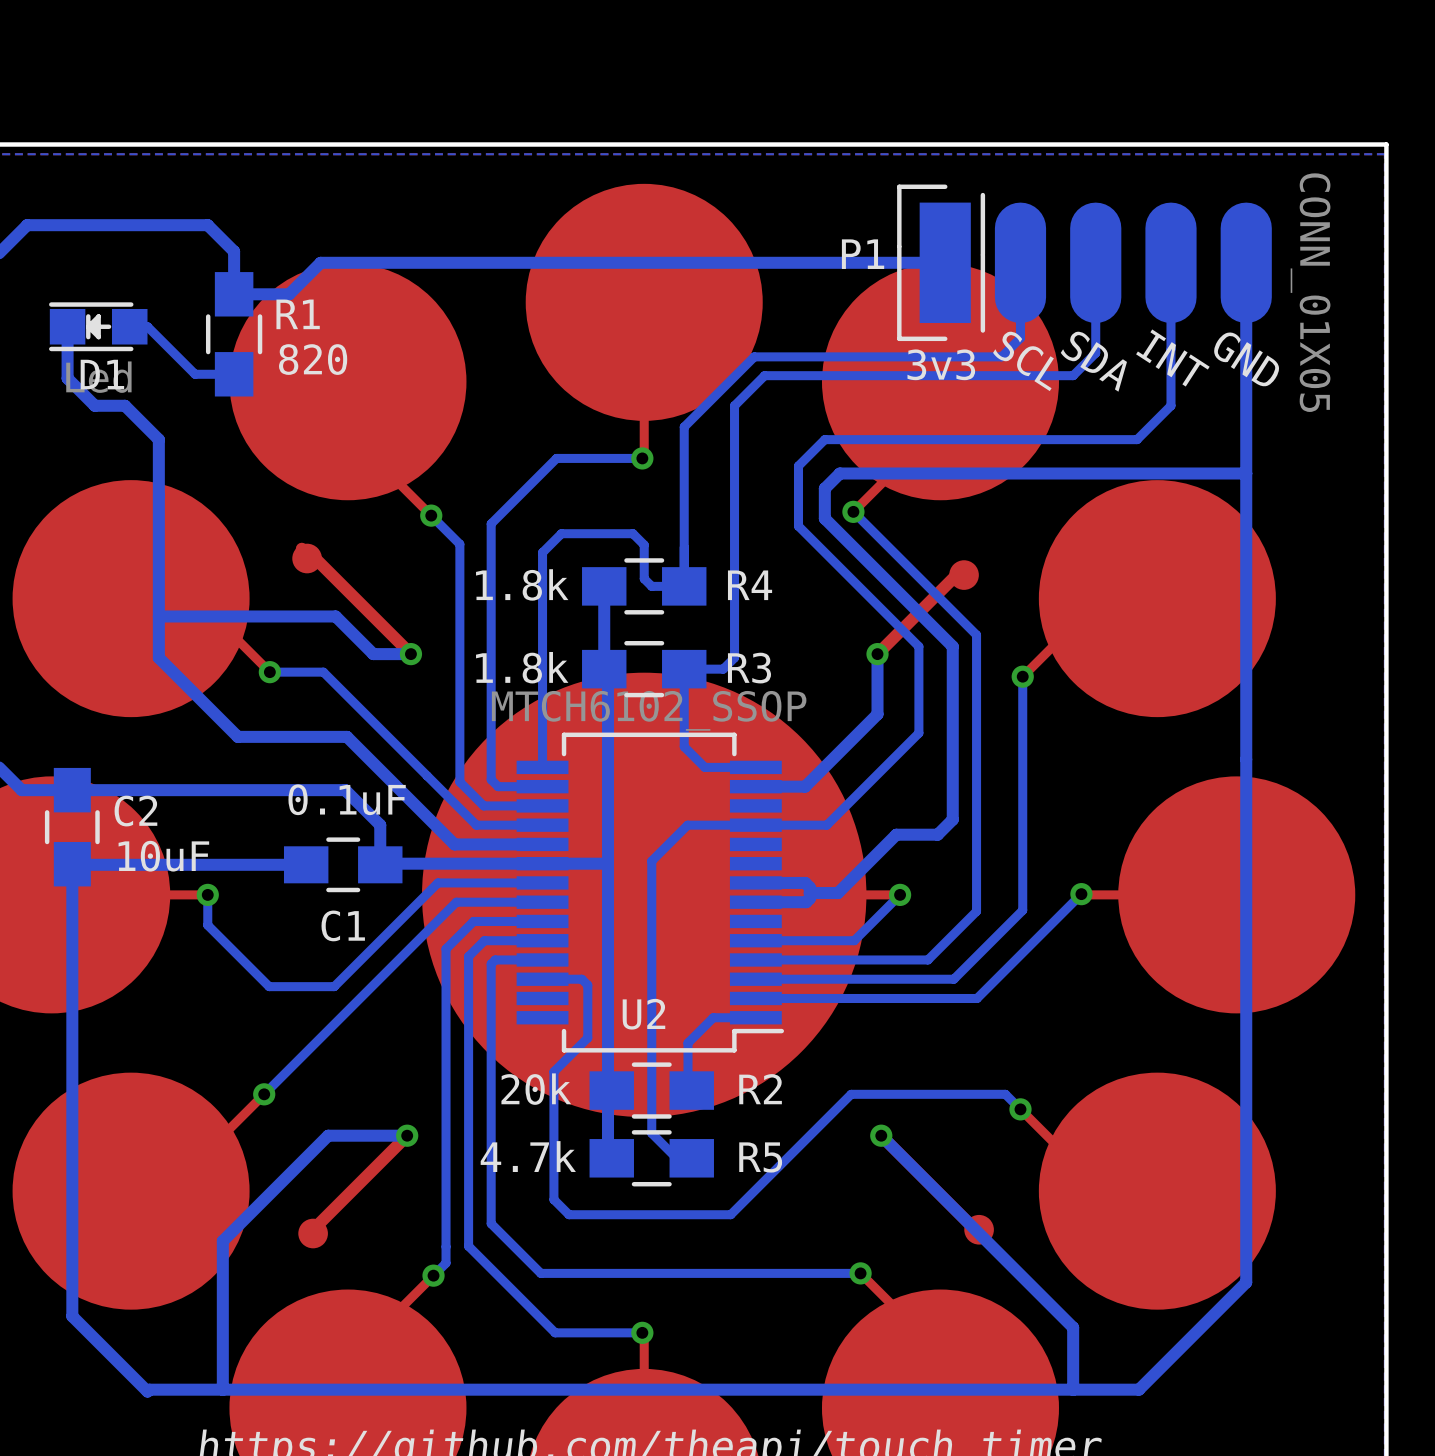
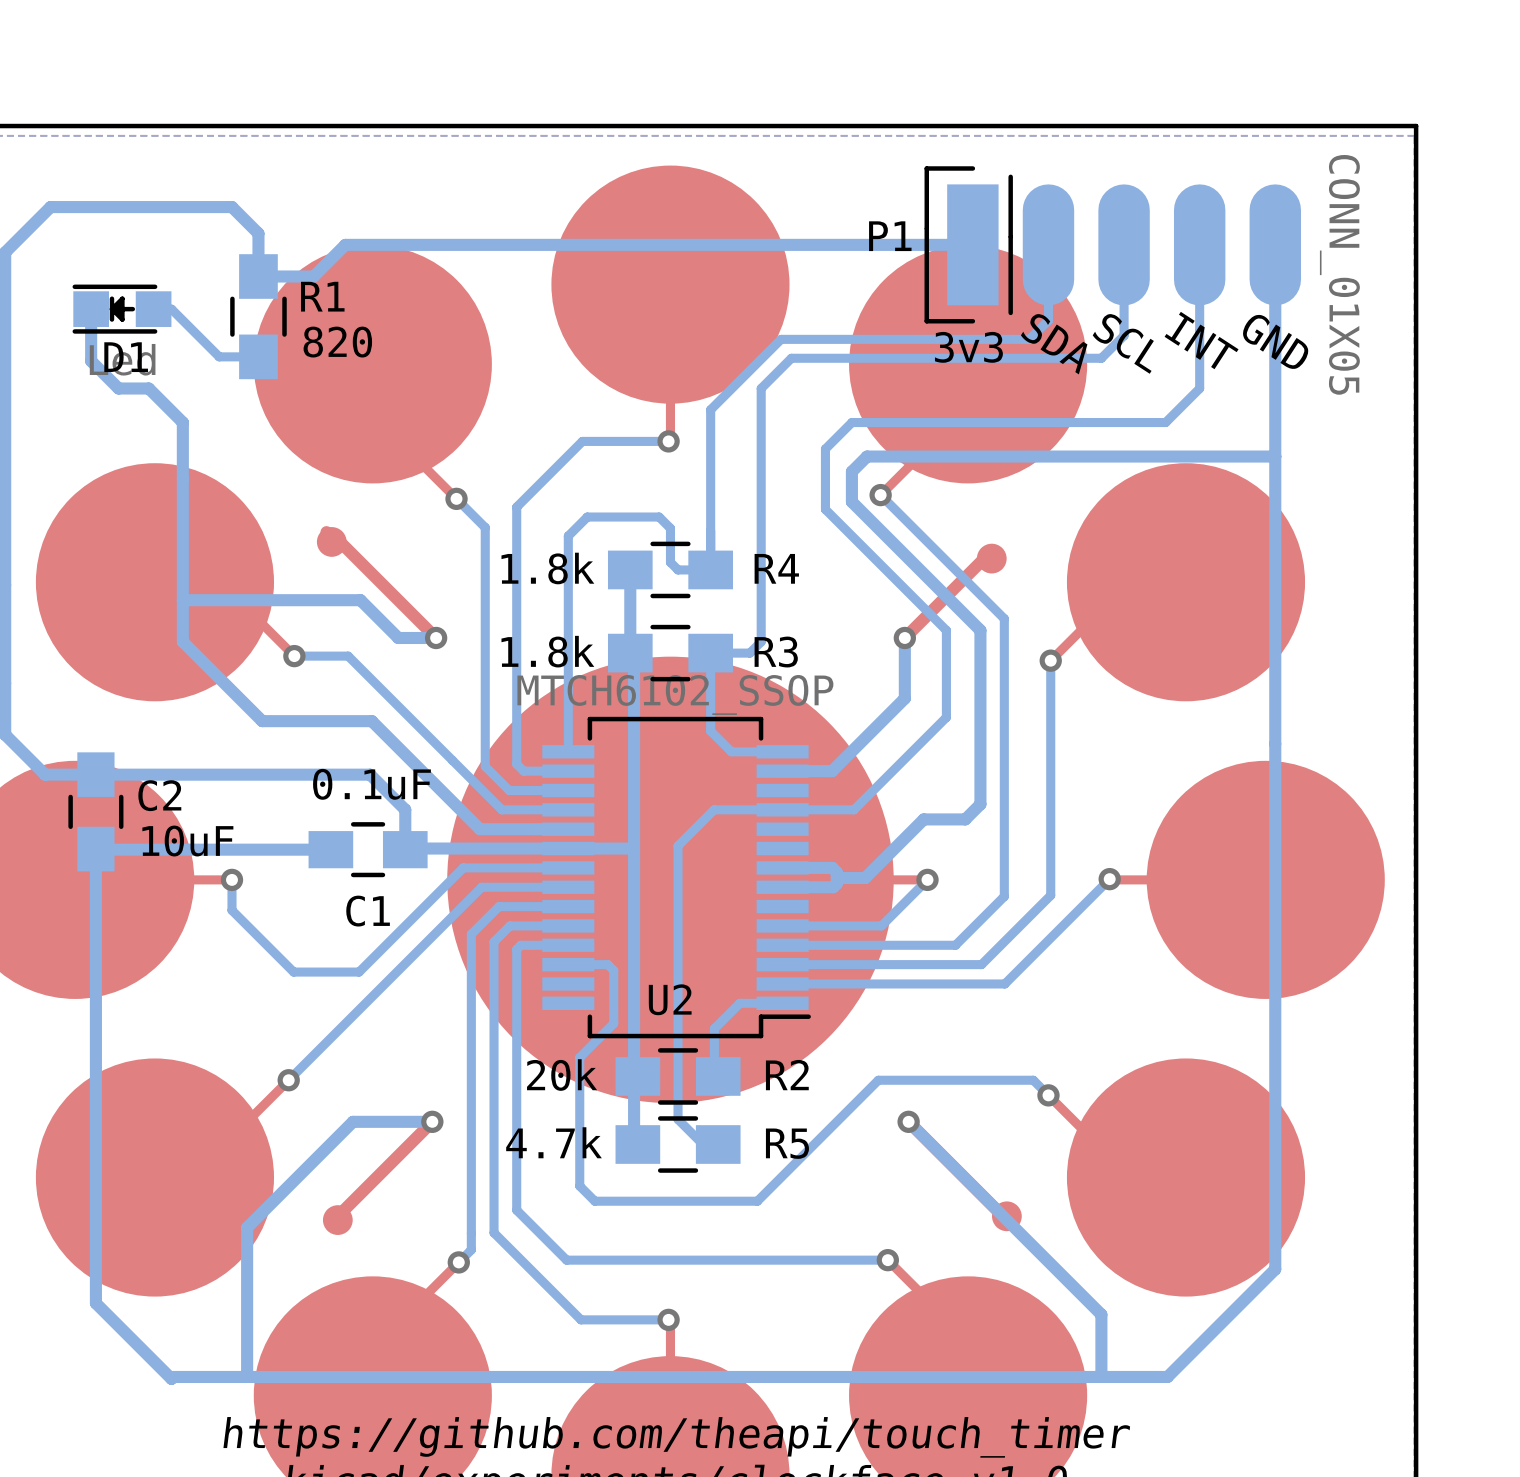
text: SCL (1023, 361) -> SDA (1054, 344)
text: SDA (1093, 361) -> SCL (1123, 343)

